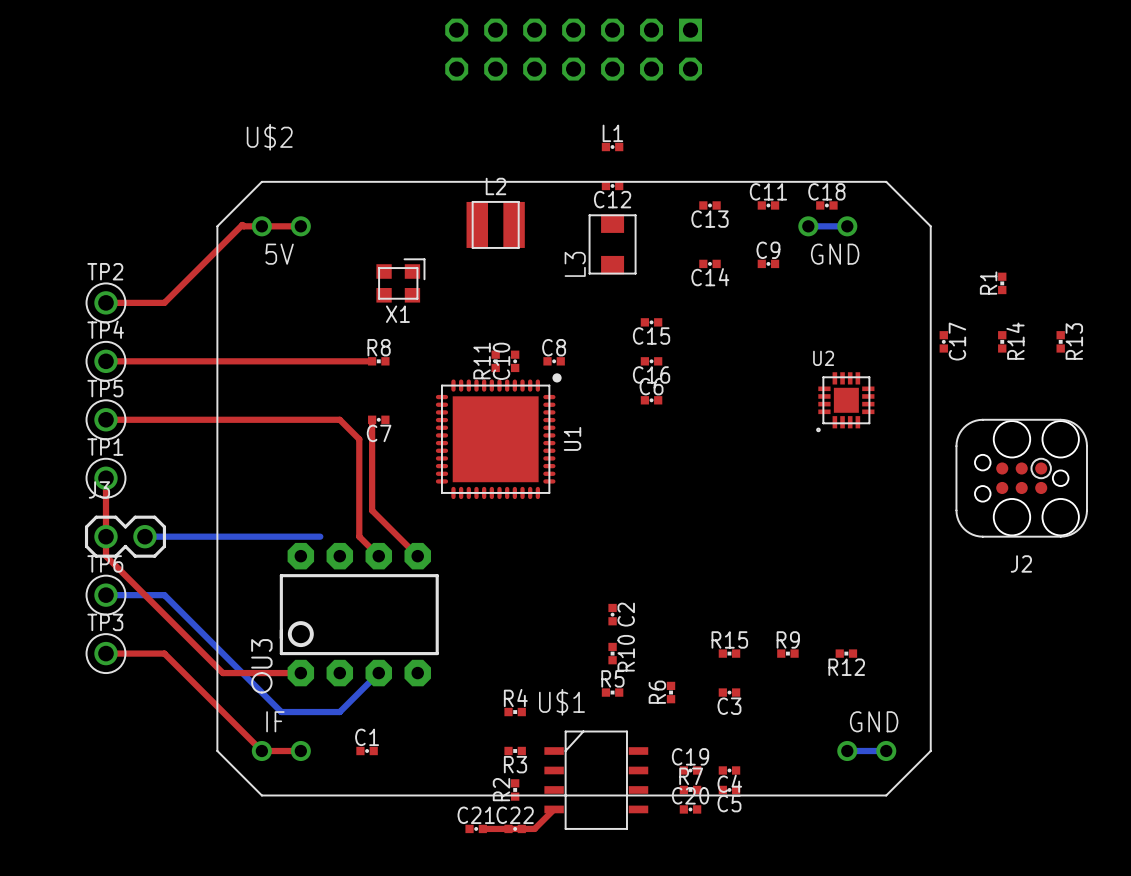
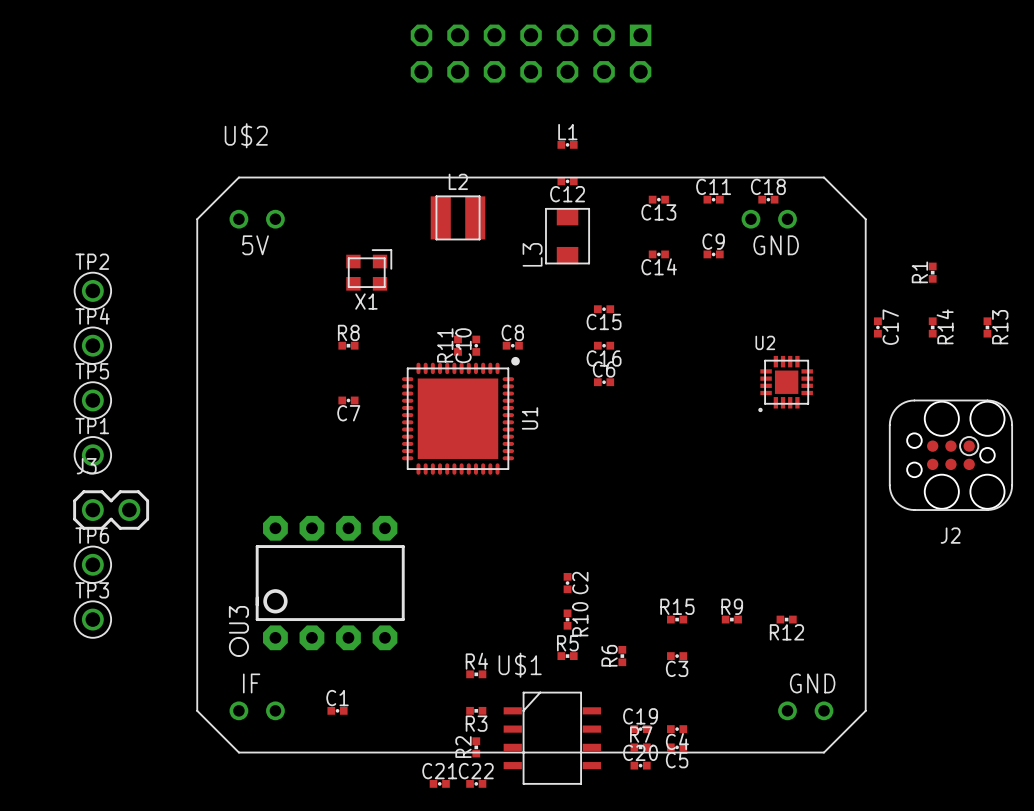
top track: (300, 226) (242, 224) (164, 302) (106, 302) -> none
bottom track: (808, 226) (847, 226) -> none
top track: (106, 361) (372, 361) -> none
top track: (106, 419) (339, 419) (359, 439) (359, 536) (378, 556) -> none
top track: (372, 419) (372, 510) (417, 556) -> none
top track: (106, 478) (106, 556) (222, 673) (300, 673) -> none
bottom track: (144, 536) (320, 536) -> none
bottom track: (106, 595) (164, 595) (281, 712) (339, 712) (378, 673) -> none
top track: (106, 653) (164, 653) (261, 751) (300, 751) -> none
bottom track: (847, 751) (886, 751) -> none
top track: (554, 809) (534, 828) (482, 828) -> none

